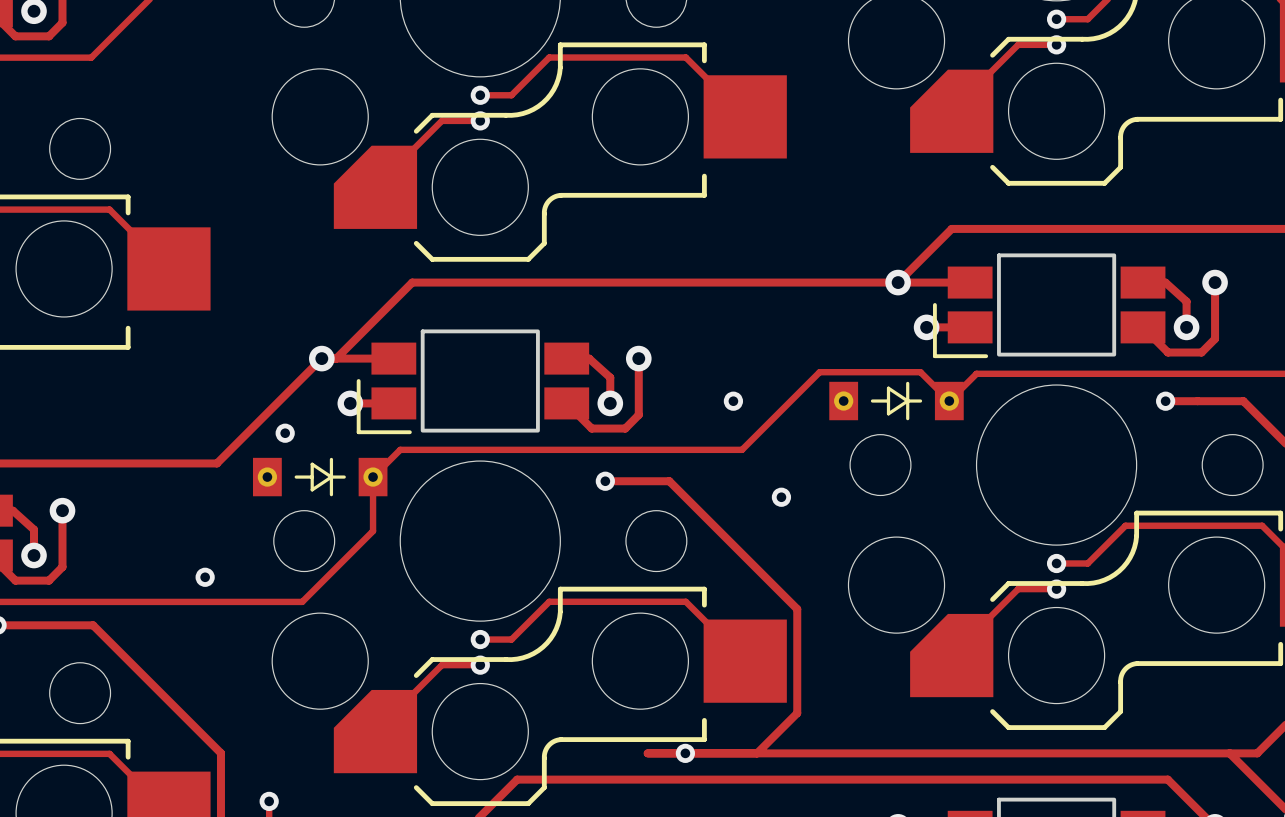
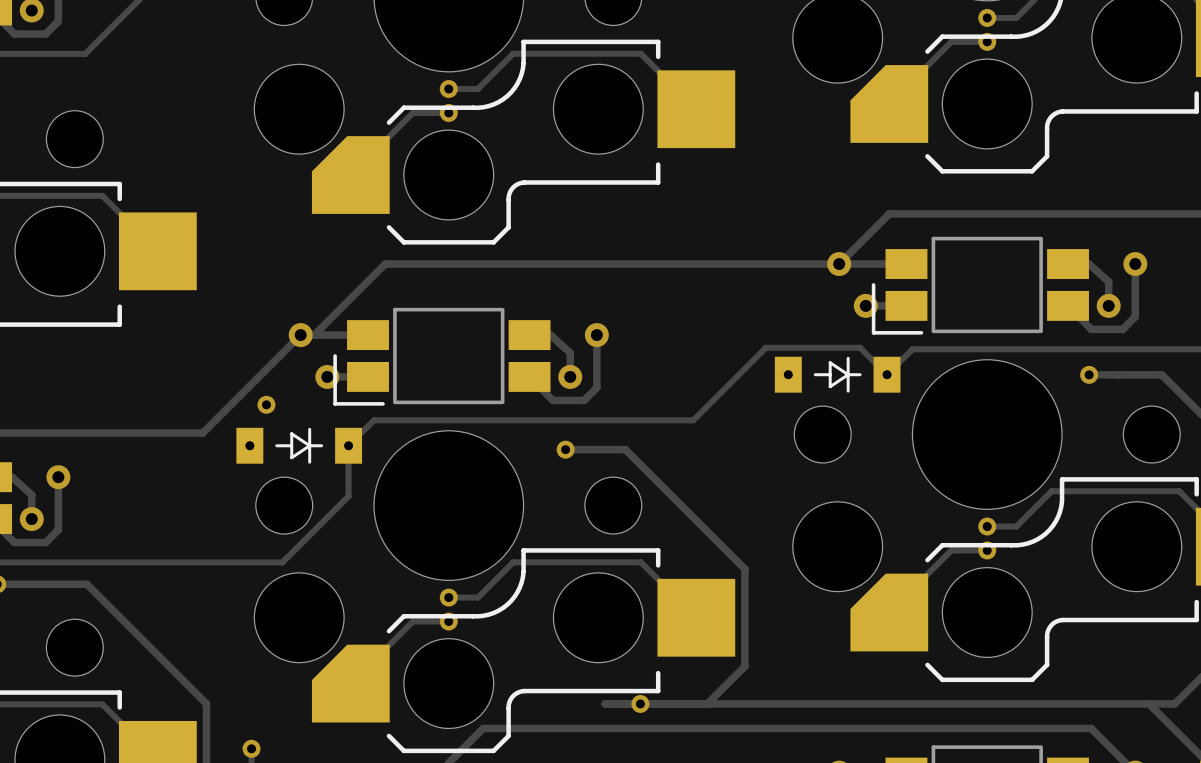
via: (733, 401) -> none
via: (781, 497) -> none
via: (205, 577) -> none

